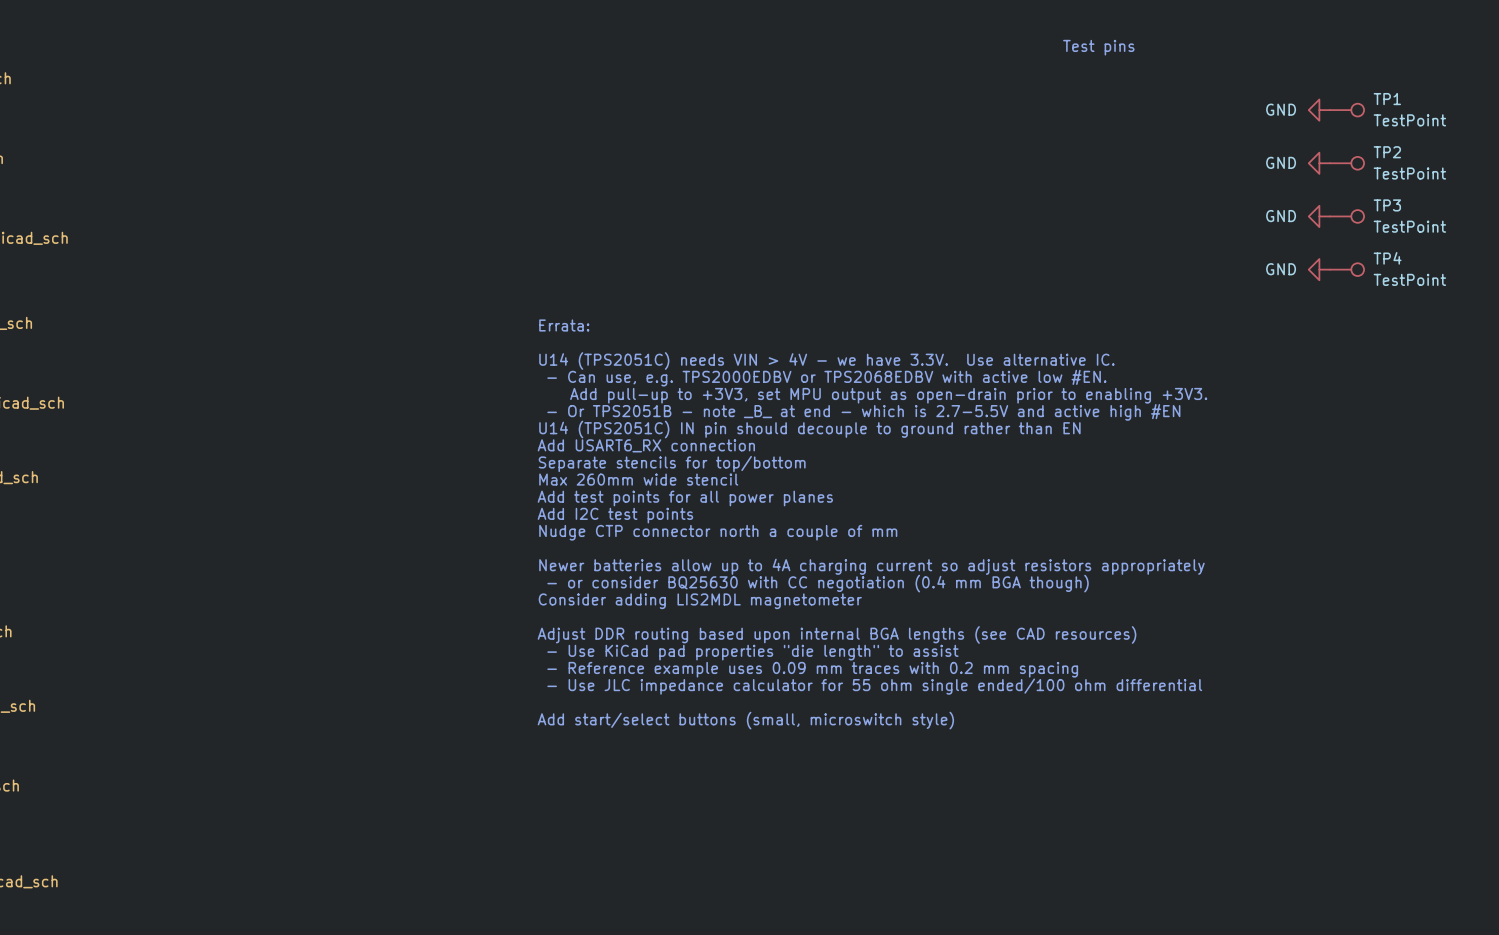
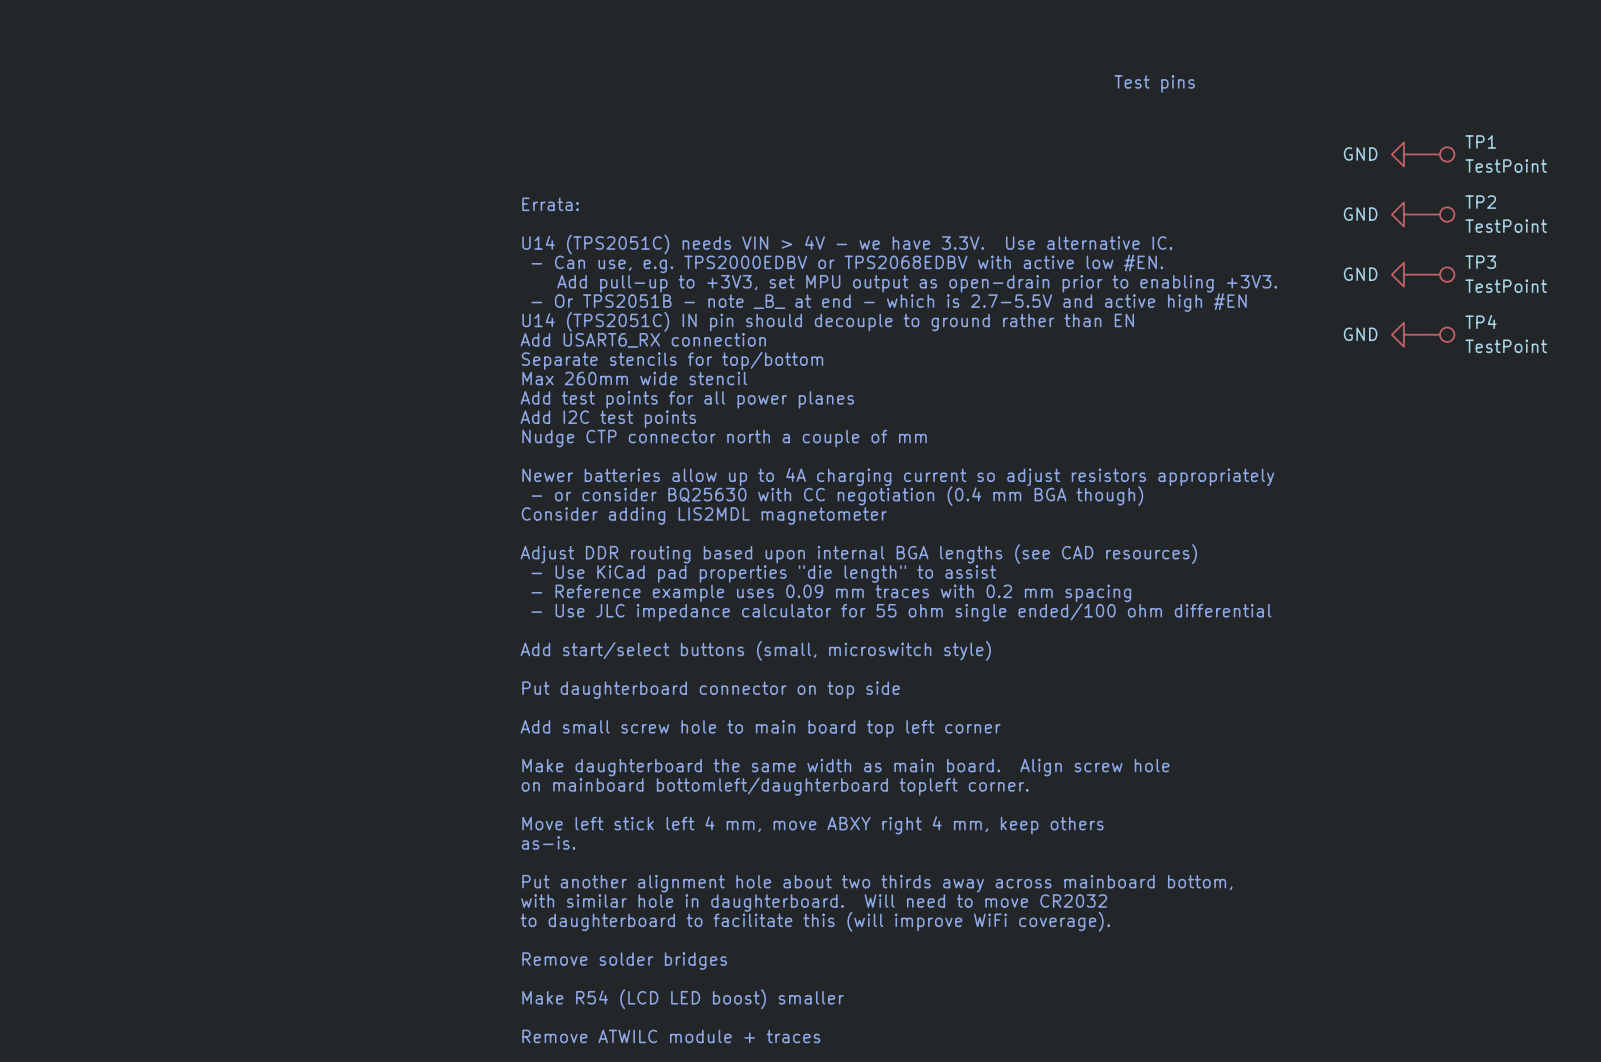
text: none -> Errata: (550, 204)
text: none -> U14 (TPS2051C) needs VIN > 4V - we have 3.3V. Use alternative IC. (847, 244)
text: none -> Add pull-up to +3V3, set MPU output as open-drain prior to enabling +3V3. (917, 283)
text: none -> - Or TPS2051B - note _B_ at end - which is 2.7-5.5V and active high #EN (889, 302)
text: none -> U14 (TPS2051C) IN pin should decouple to ground rather than EN (828, 321)
text: none -> Separate stencils for top/bottom (672, 360)
text: none -> Max 260mm wide stencil (634, 378)
text: Errata: (564, 325) -> Add test points for all power planes (687, 399)
text: none -> Add I2C test points (608, 419)
text: U14 (TPS2051C) needs VIN > 4V - we have 3.3V. Use alternative IC. (826, 360) -> Nudge CTP connector north a couple of mm (724, 438)
text position: - Can use, e.g. TPS2000EDBV or TPS2068EDBV with active low #EN. (826, 378) -> - Can use, e.g. TPS2000EDBV or TPS2068EDBV with active low #EN. (847, 263)
text: Add pull-up to +3V3, set MPU output as open-drain prior to enabling +3V3. (888, 395) -> Newer batteries allow up to 4A charging current so adjust resistors appropriately (898, 476)
text: - Or TPS2051B - note _B_ at end - which is 2.7-5.5V and active high #EN (863, 412) -> - or consider BQ25630 with CC negotiation (0.4 mm BGA though) (837, 496)
text: U14 (TPS2051C) IN pin should decouple to ground rather than EN (809, 429) -> Consider adding LIS2MDL magnetometer (704, 515)
text position: Add USART6_RX connection (646, 445) -> Add USART6_RX connection (643, 340)
text: Separate stencils for top/bottom (672, 463) -> Adjust DDR routing based upon internal BGA lengths (see CAD resources) (858, 554)
text: Max 260mm wide stencil (638, 479) -> - Use KiCad pad properties "die length" to assist (763, 574)
text: Add test points for all power planes (685, 498) -> - Reference example uses 0.09 mm traces with 0.2 mm spacing (831, 593)
text: Add I2C test points (615, 515) -> - Use JLC impedance calculator for 55 ohm single ended/100 ohm differential (901, 612)
text: Nudge CTP connector north a couple of mm (718, 532) -> none
text: none -> Add start/select buttons (small, microswitch style) (755, 650)
text: Newer batteries allow up to 4A charging current so adjust resistors appropriately (871, 566) -> none
text: - or consider BQ25630 with CC negotiation (0.4 mm BGA though) (818, 583) -> Put daughterboard connector on top side (711, 690)
text: Consider adding LIS2MDL magnetometer (700, 601) -> none
text: none -> Add small screw hole to main board top left corner (760, 728)
text: Adjust DDR routing based upon internal BGA lengths (see CAD resources) (837, 634) -> none
text: - Use KiCad pad properties "die length" to assist (752, 652) -> Make daughterboard the same width as main board. Align screw hole (845, 767)
text: - Reference example uses 0.09 mm traces with 0.2 mm spacing (812, 669) -> on mainboard bottomleft/daughterboard topleft corner. (775, 786)
text: - Use JLC impedance calculator for 55 ohm single ended/100 ohm differential (874, 686) -> none
text: none -> Move left stick left 4 mm, move ABXY right 4 mm, keep others (812, 825)
text: Add start/select buttons (small, microswitch style) (745, 720) -> as-is. (548, 842)
text: none -> Put another alignment hole about two thirds away across mainboard bottom, (877, 883)
text: none -> with similar hole in daughterboard. Will need to move CR2032 (814, 903)
text: none -> to daughterboard to facilitate this (will improve WiFi coverage). (815, 921)
text: none -> Remove solder bridges (624, 961)
text: none -> Make R54 (LCD LED boost) smaller (683, 999)
text: none -> Remove ATWILC module + traces (671, 1036)

